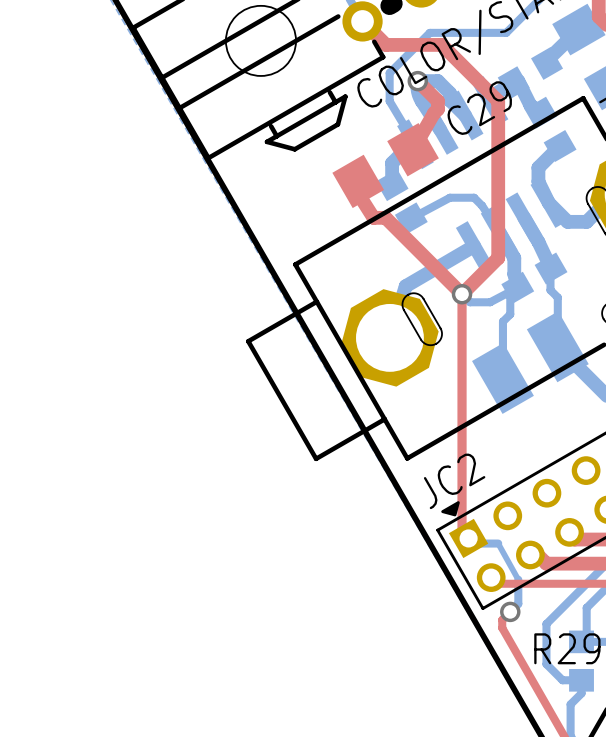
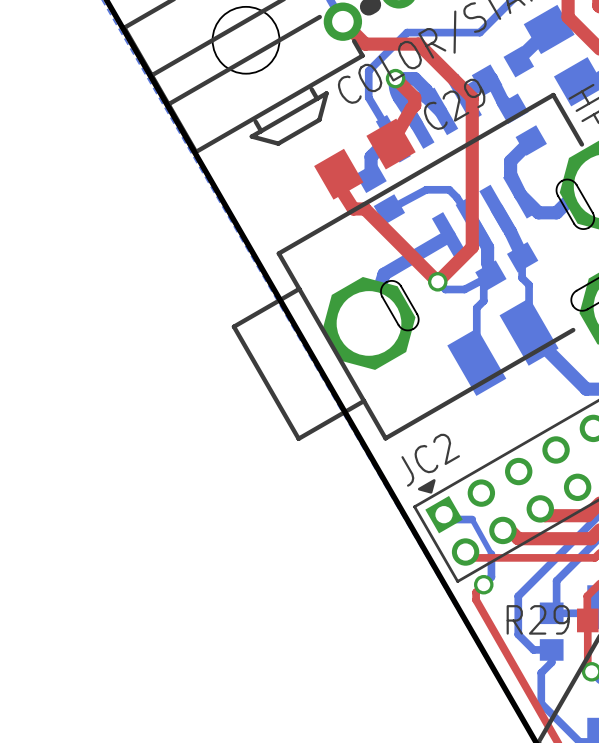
top track: (462, 294) (462, 531) (468, 538) -> none

